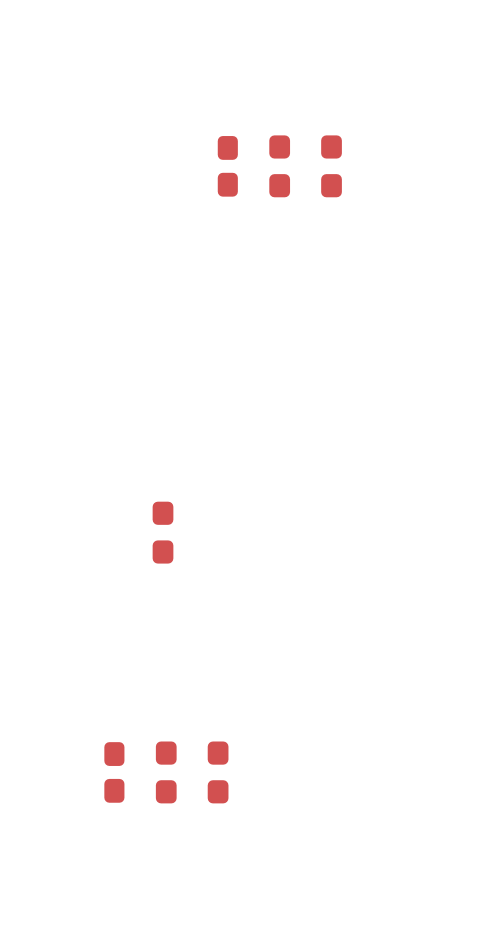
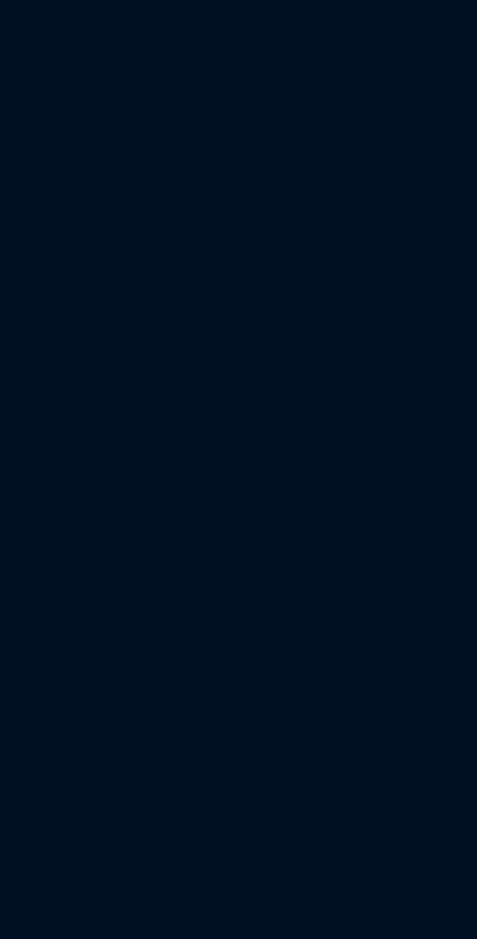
part: (227, 166) -> none
part: (279, 166) -> none
part: (331, 166) -> none
part: (163, 532) -> none
part: (114, 772) -> none
part: (166, 772) -> none
part: (218, 772) -> none

